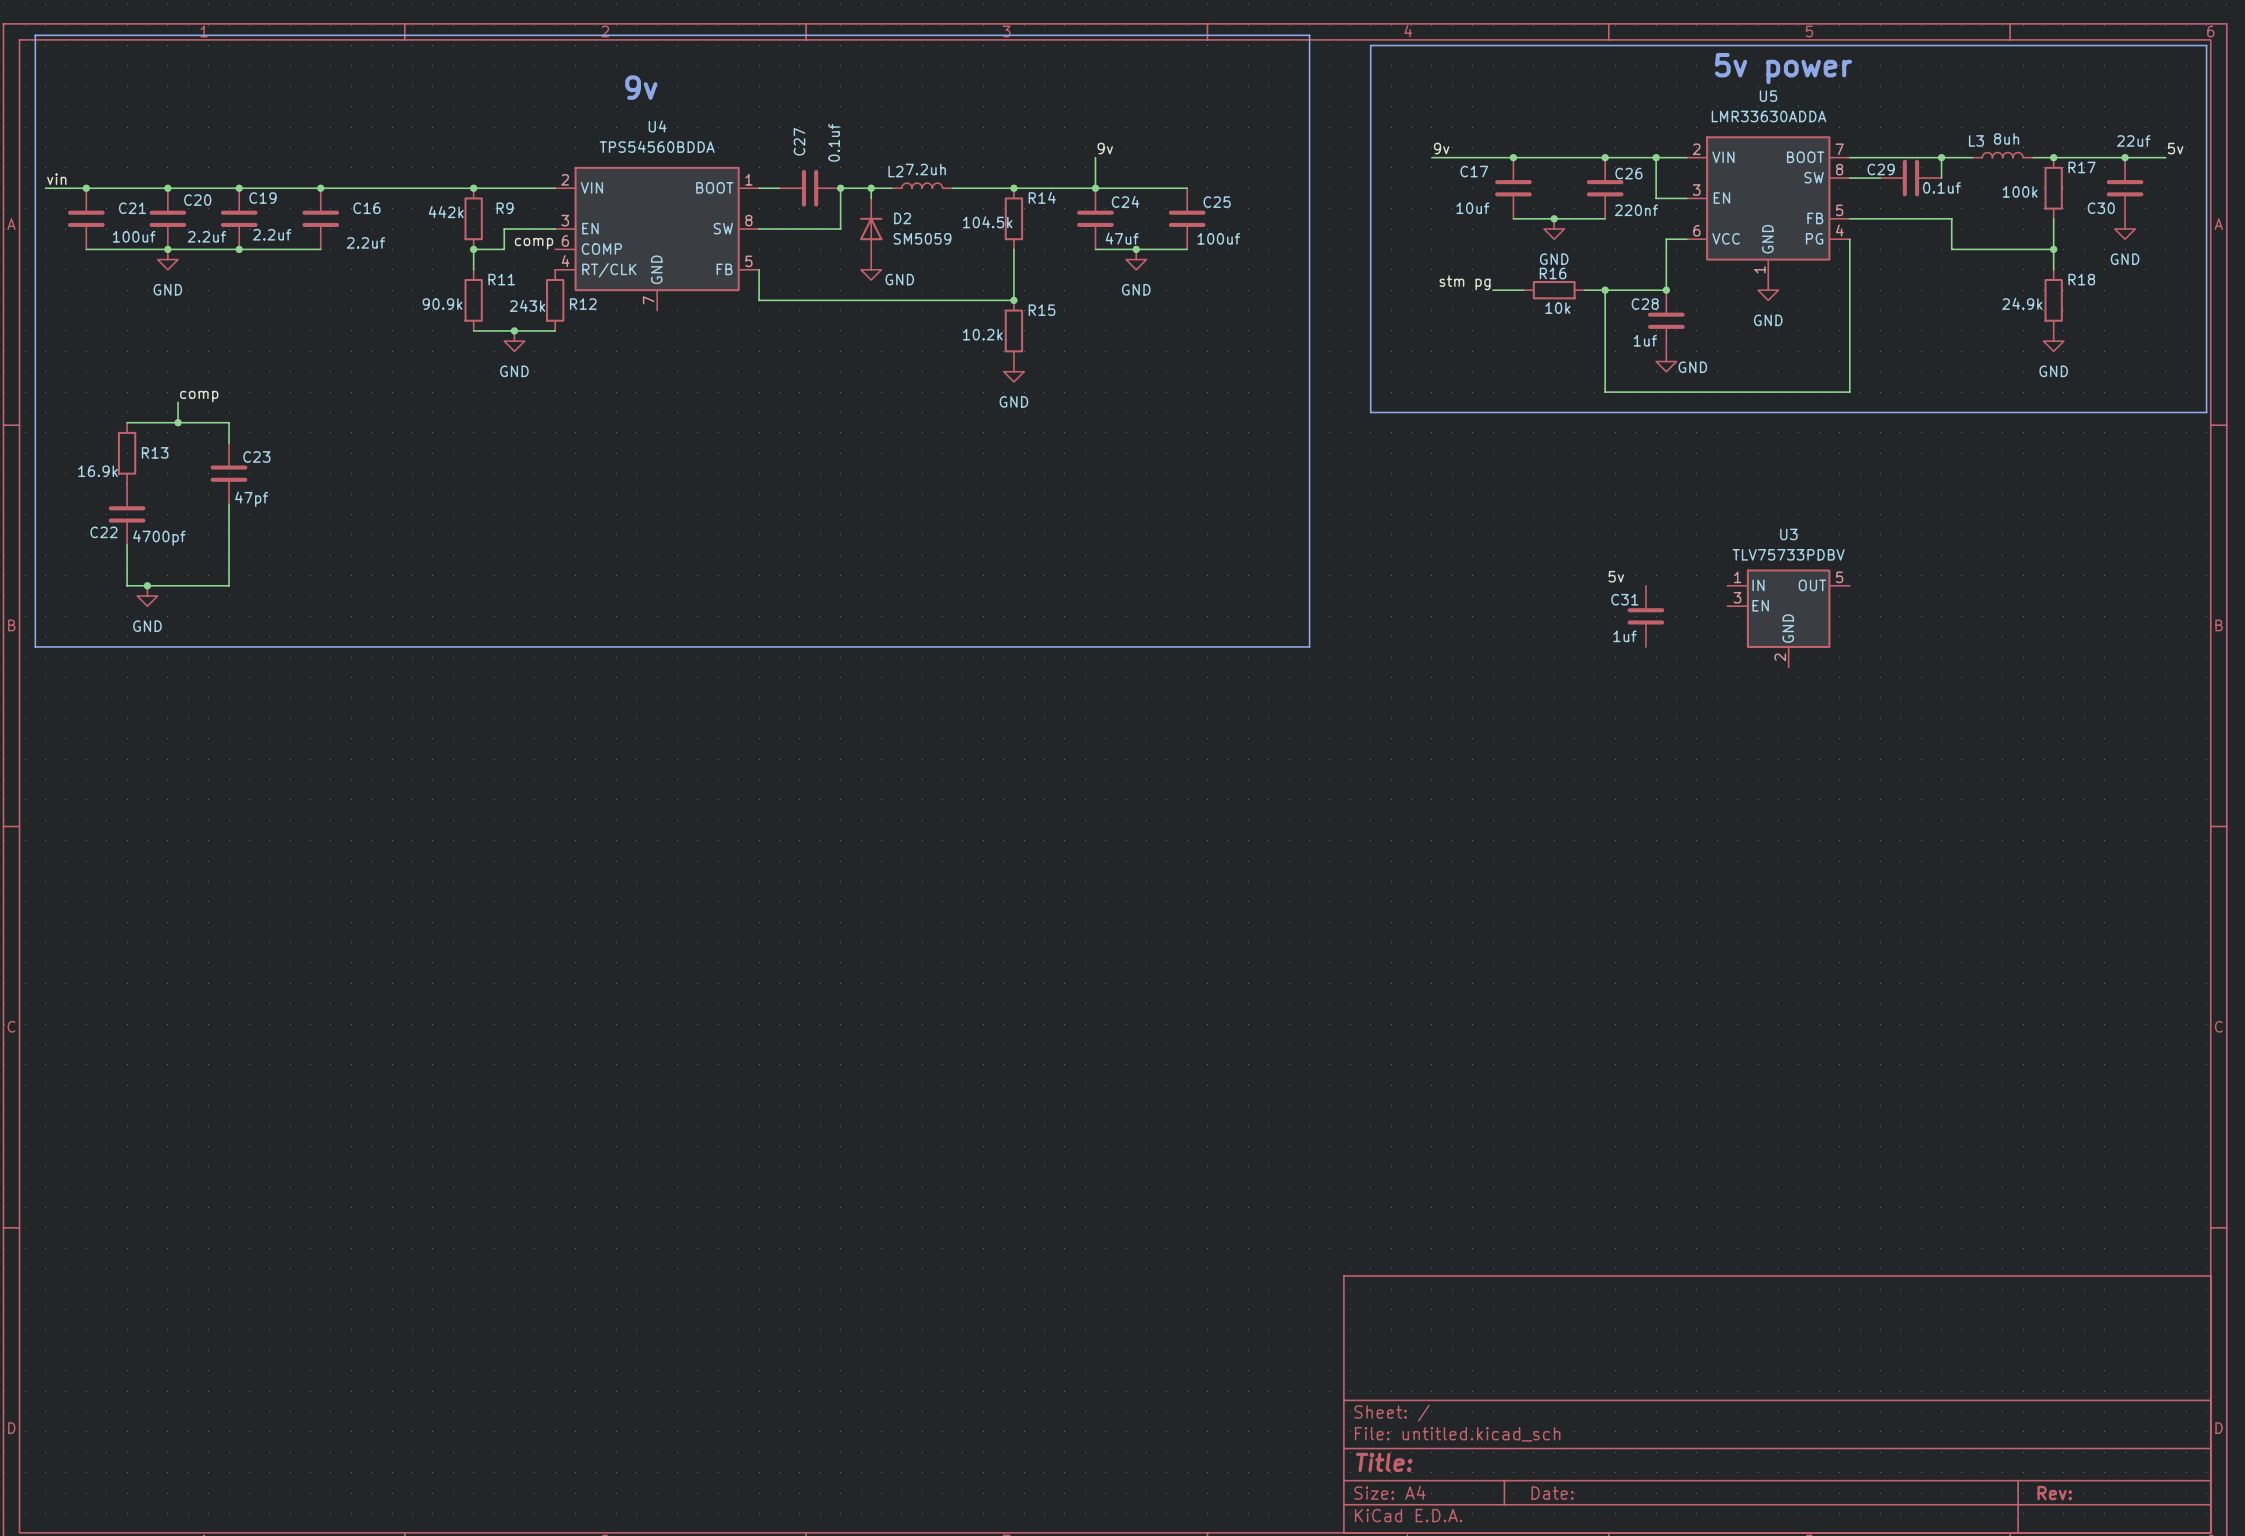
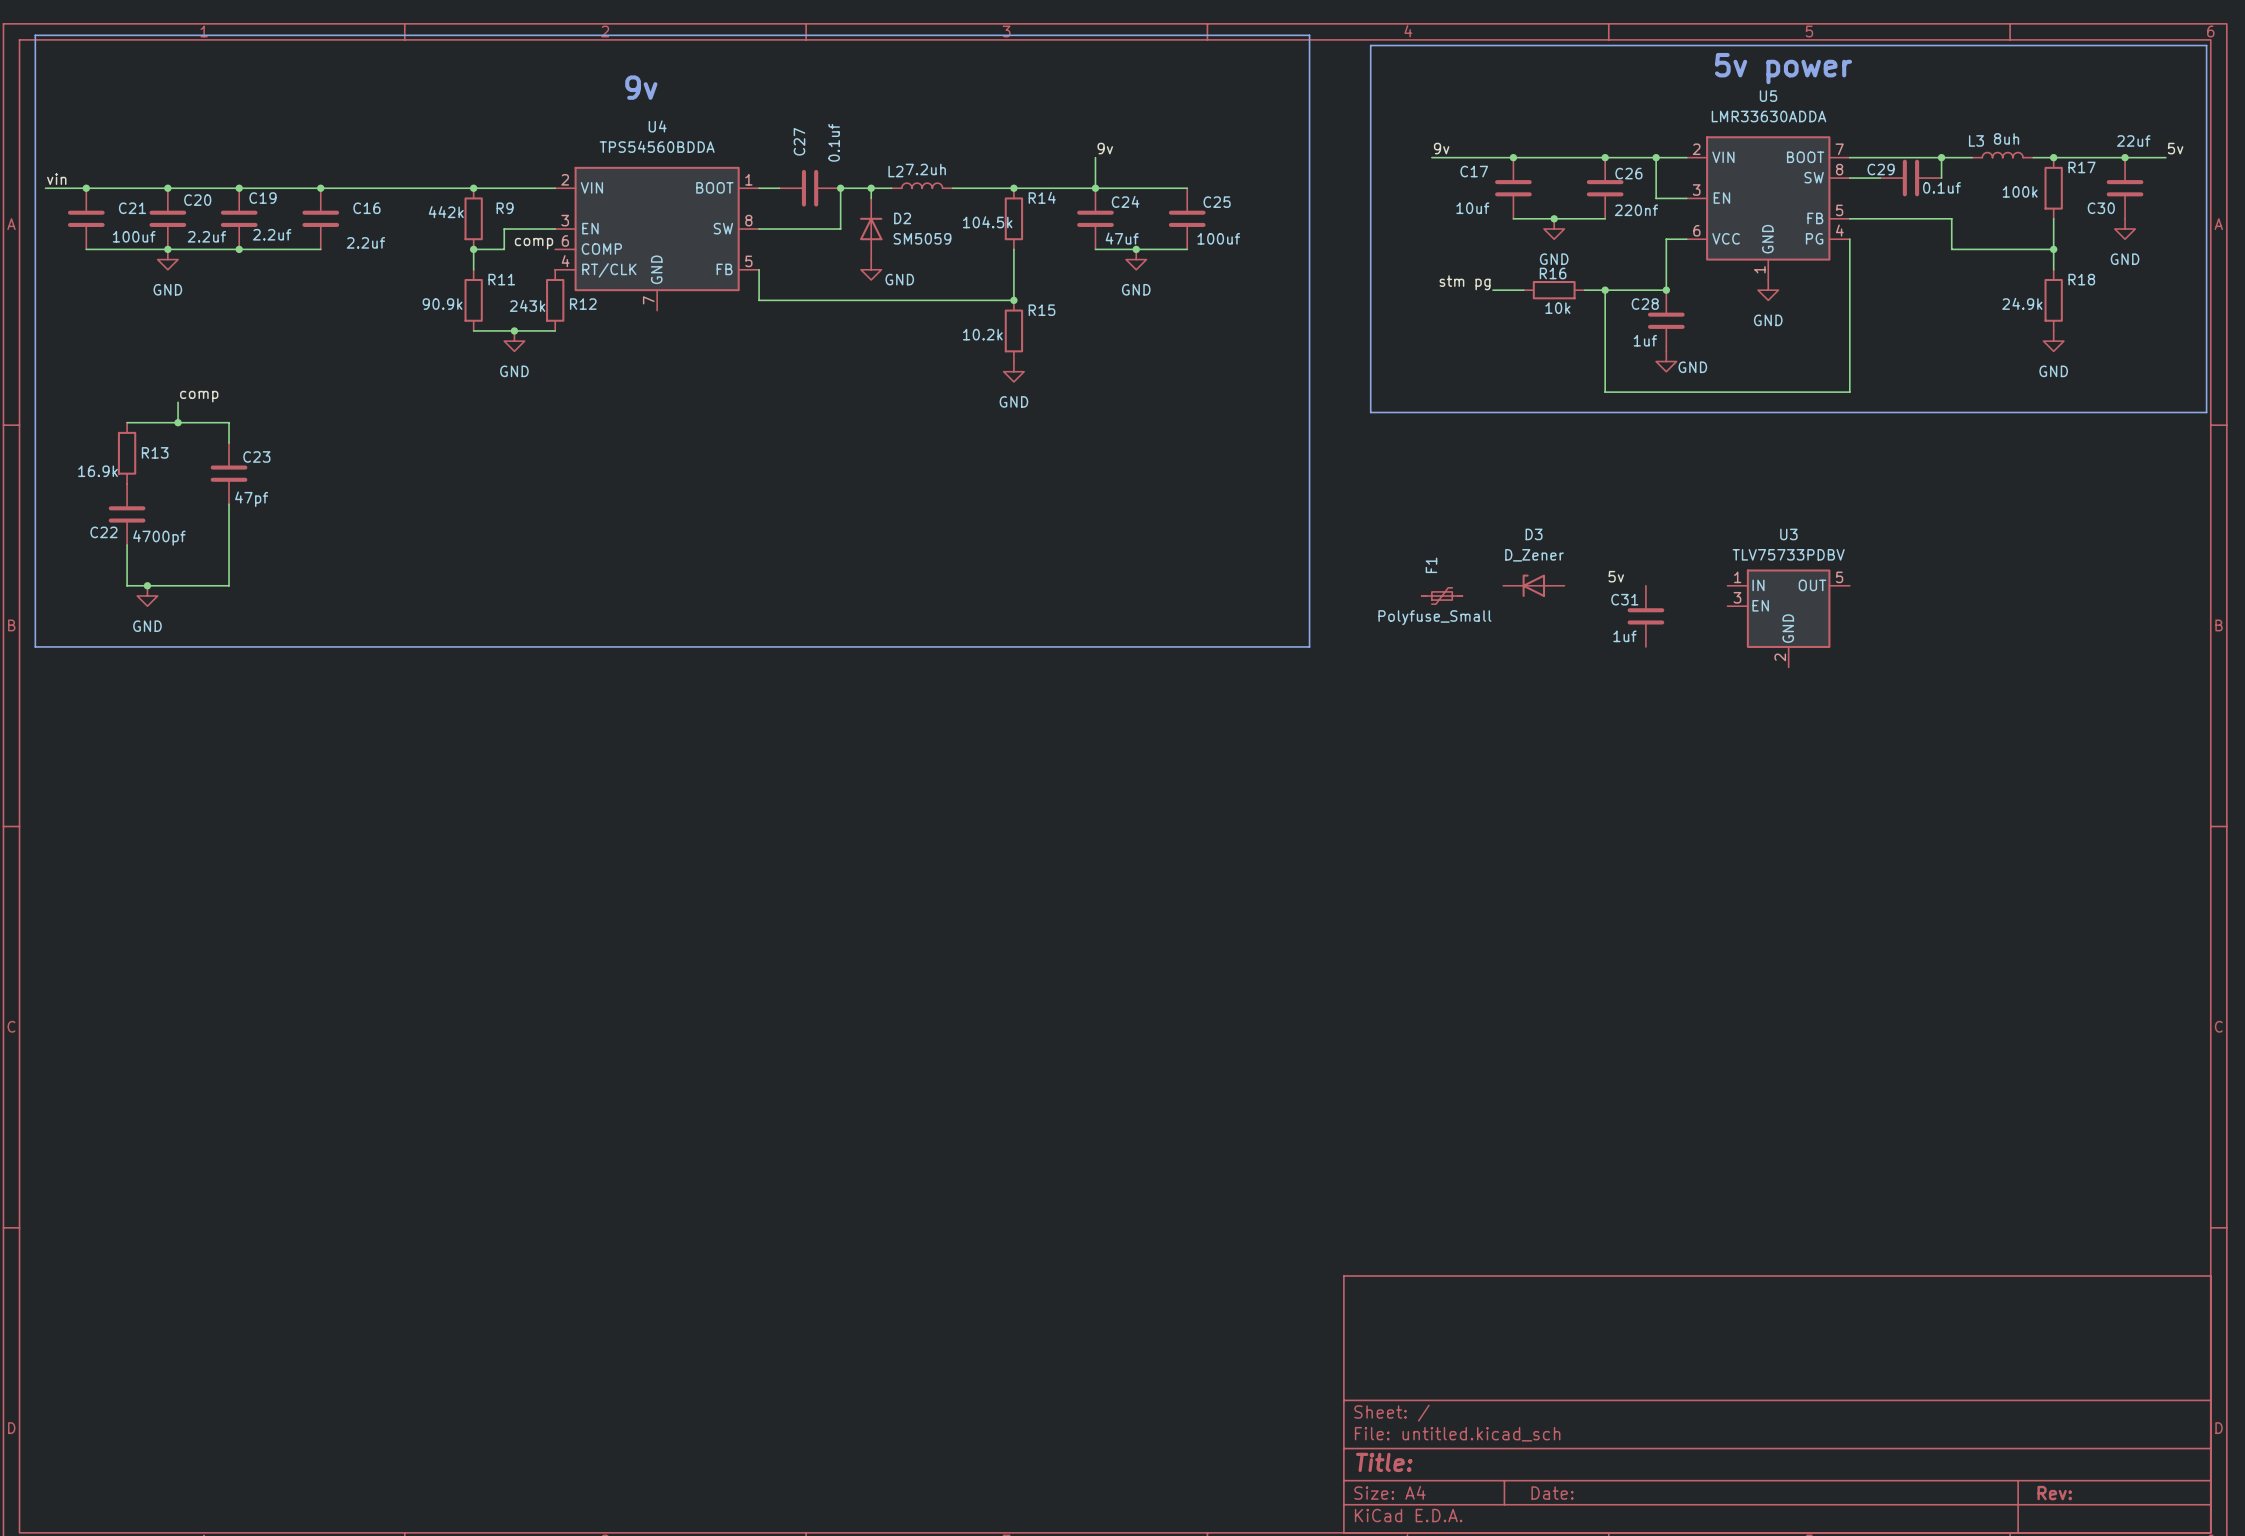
D3: none -> D_Zener (1533, 585)
F1: none -> Polyfuse_Small (1442, 595)

